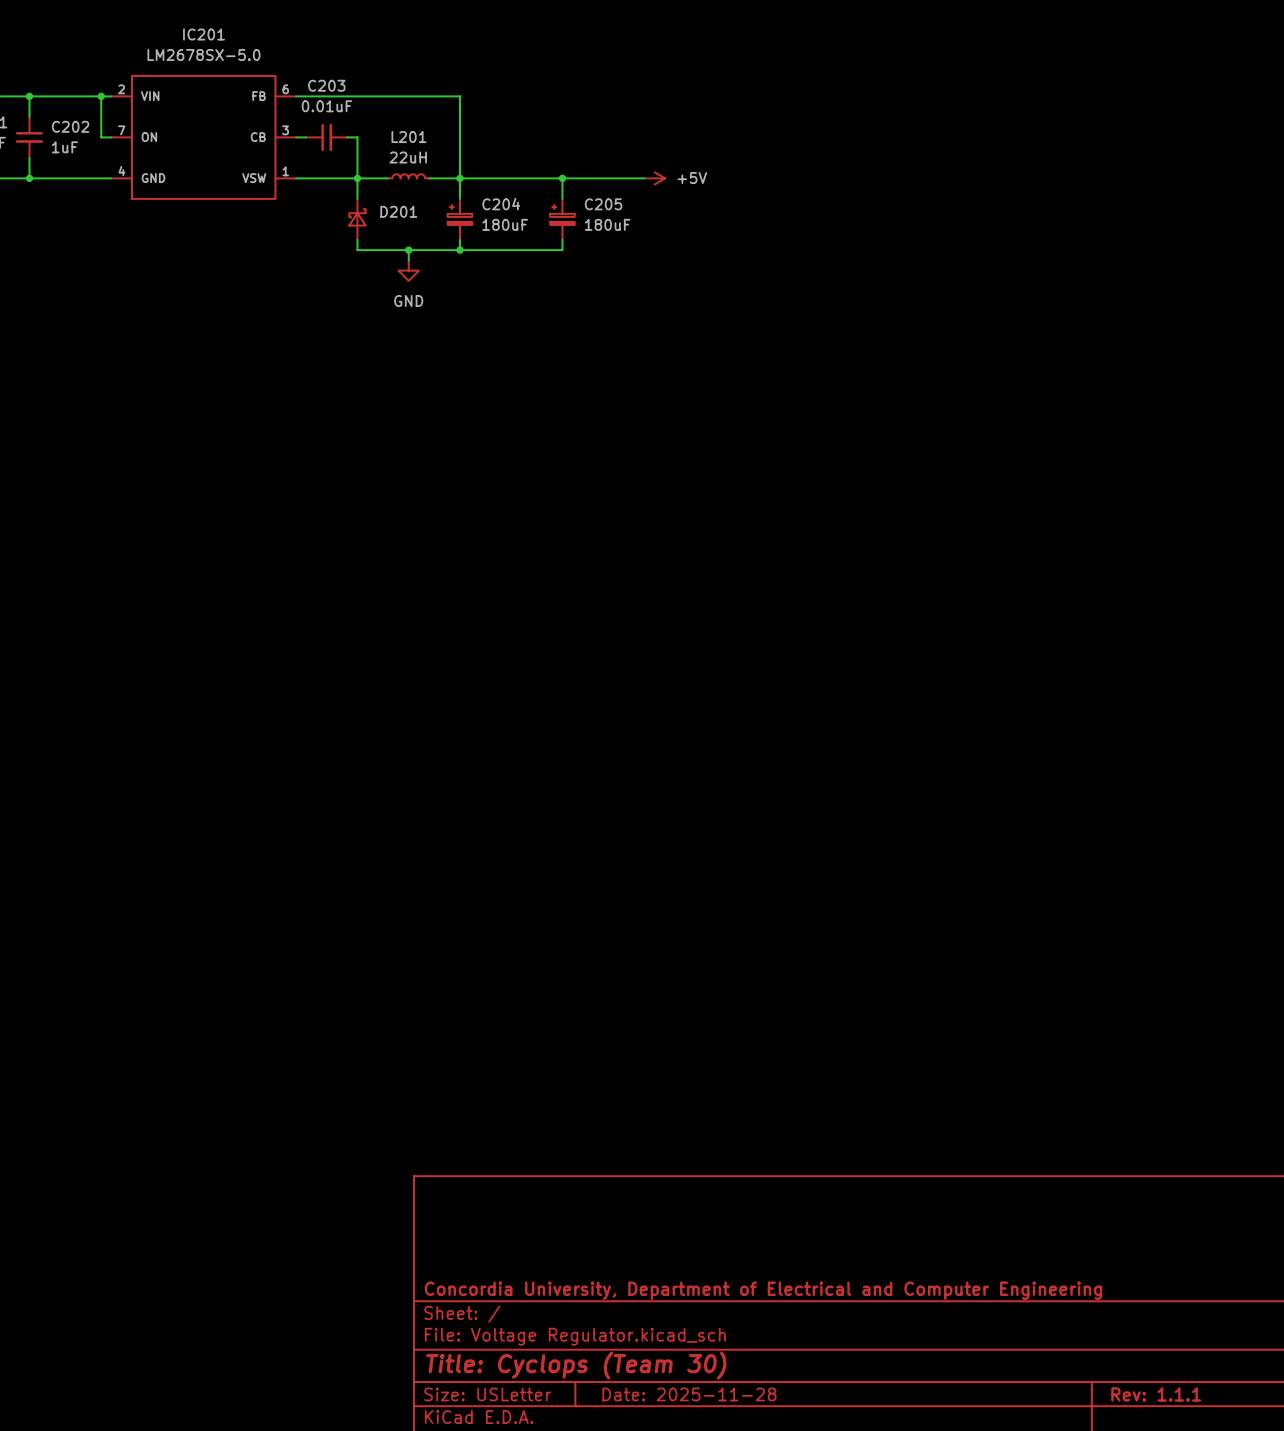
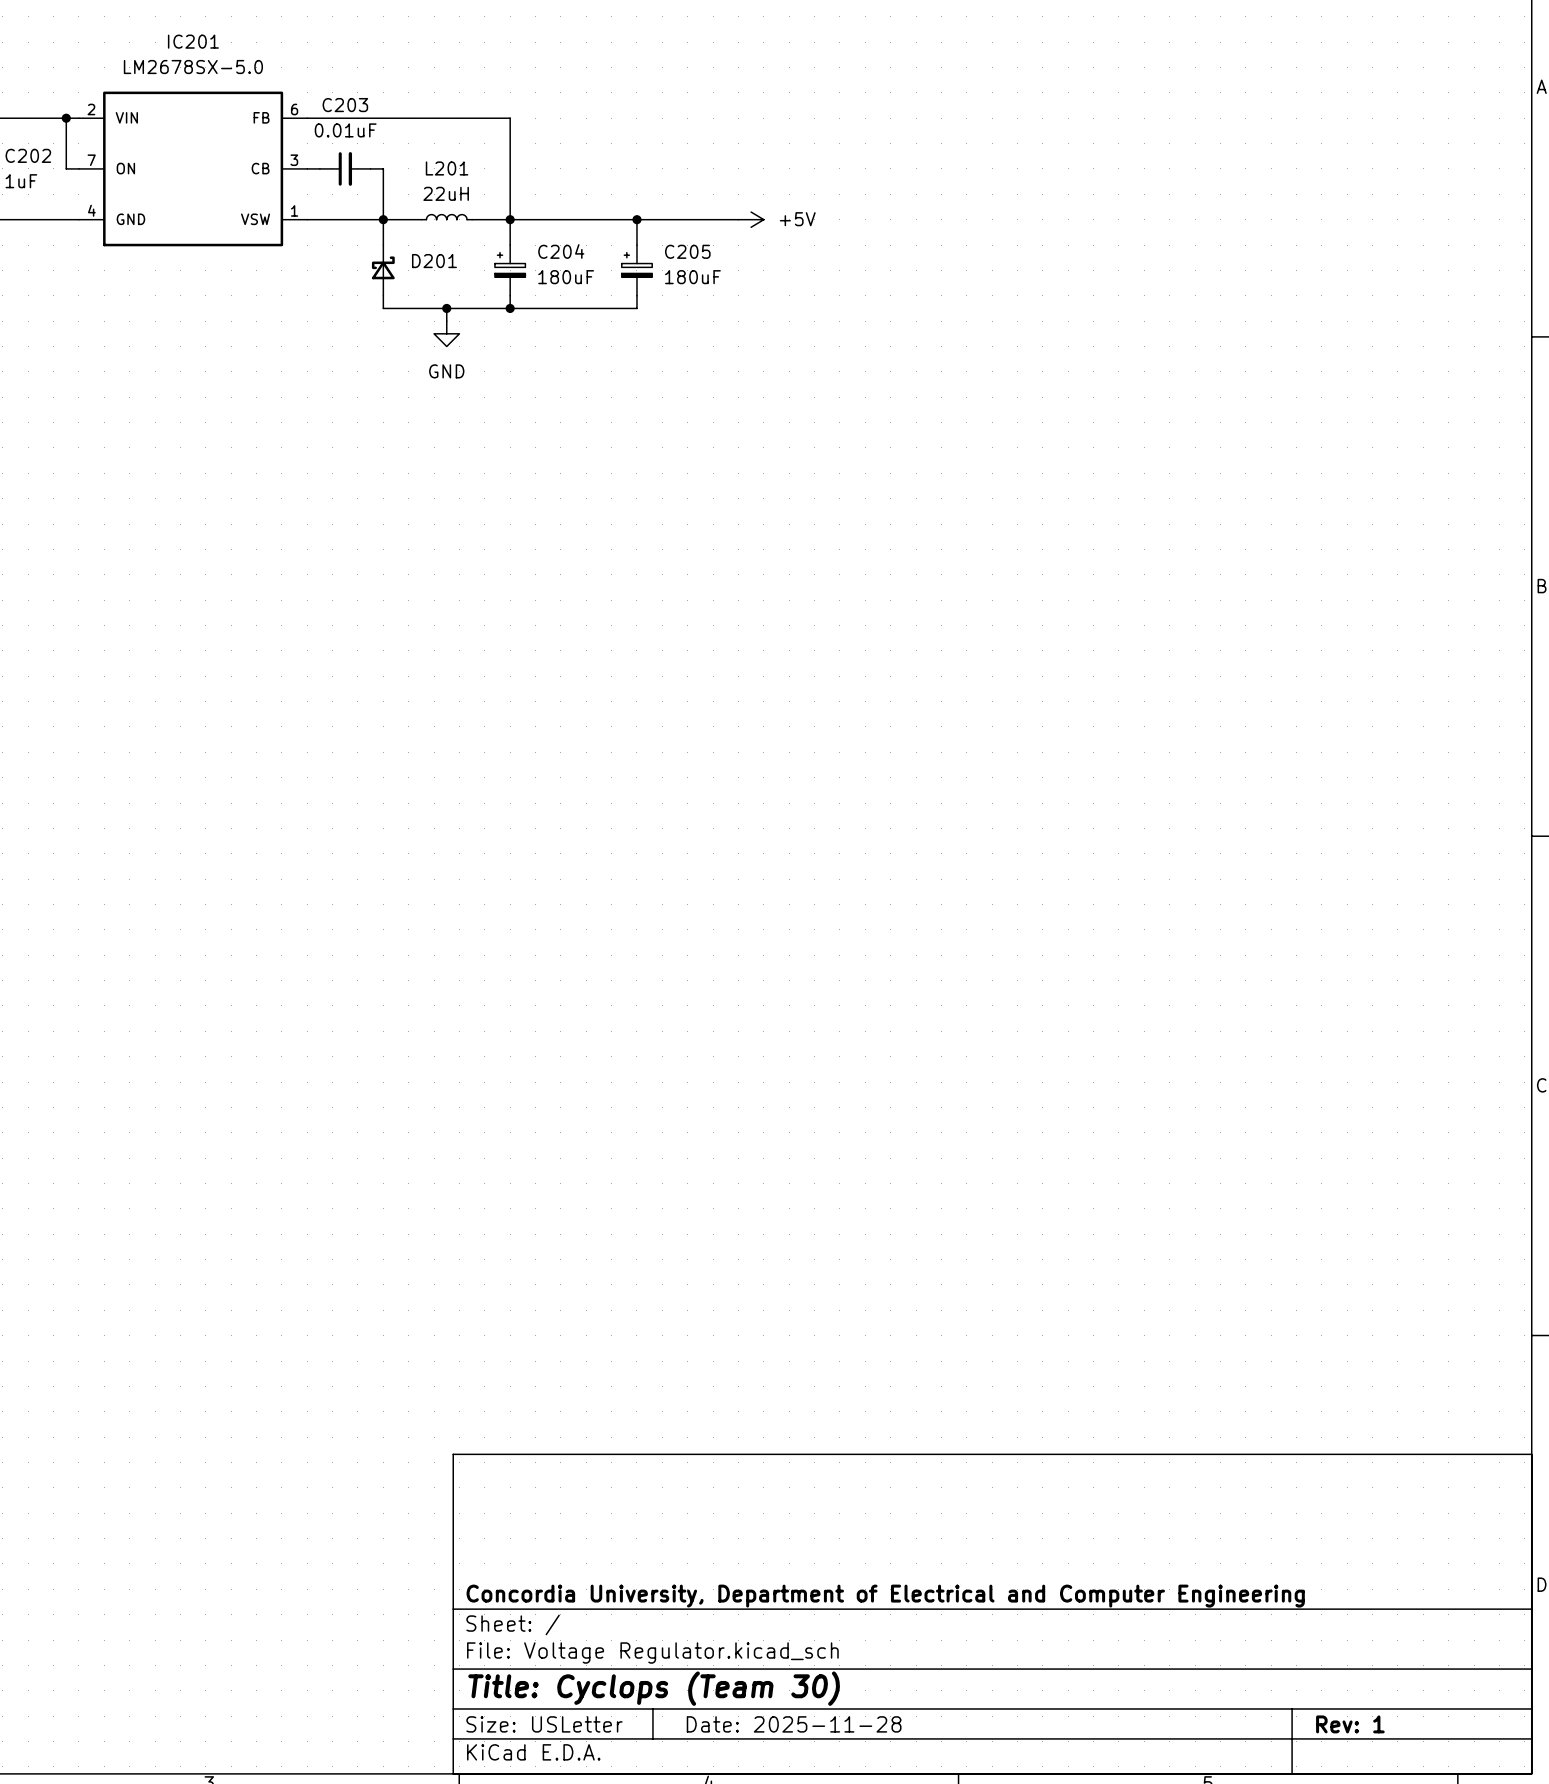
title block: Rev: 1.1.1 (1156, 1394) -> Rev: 1 (1350, 1724)

